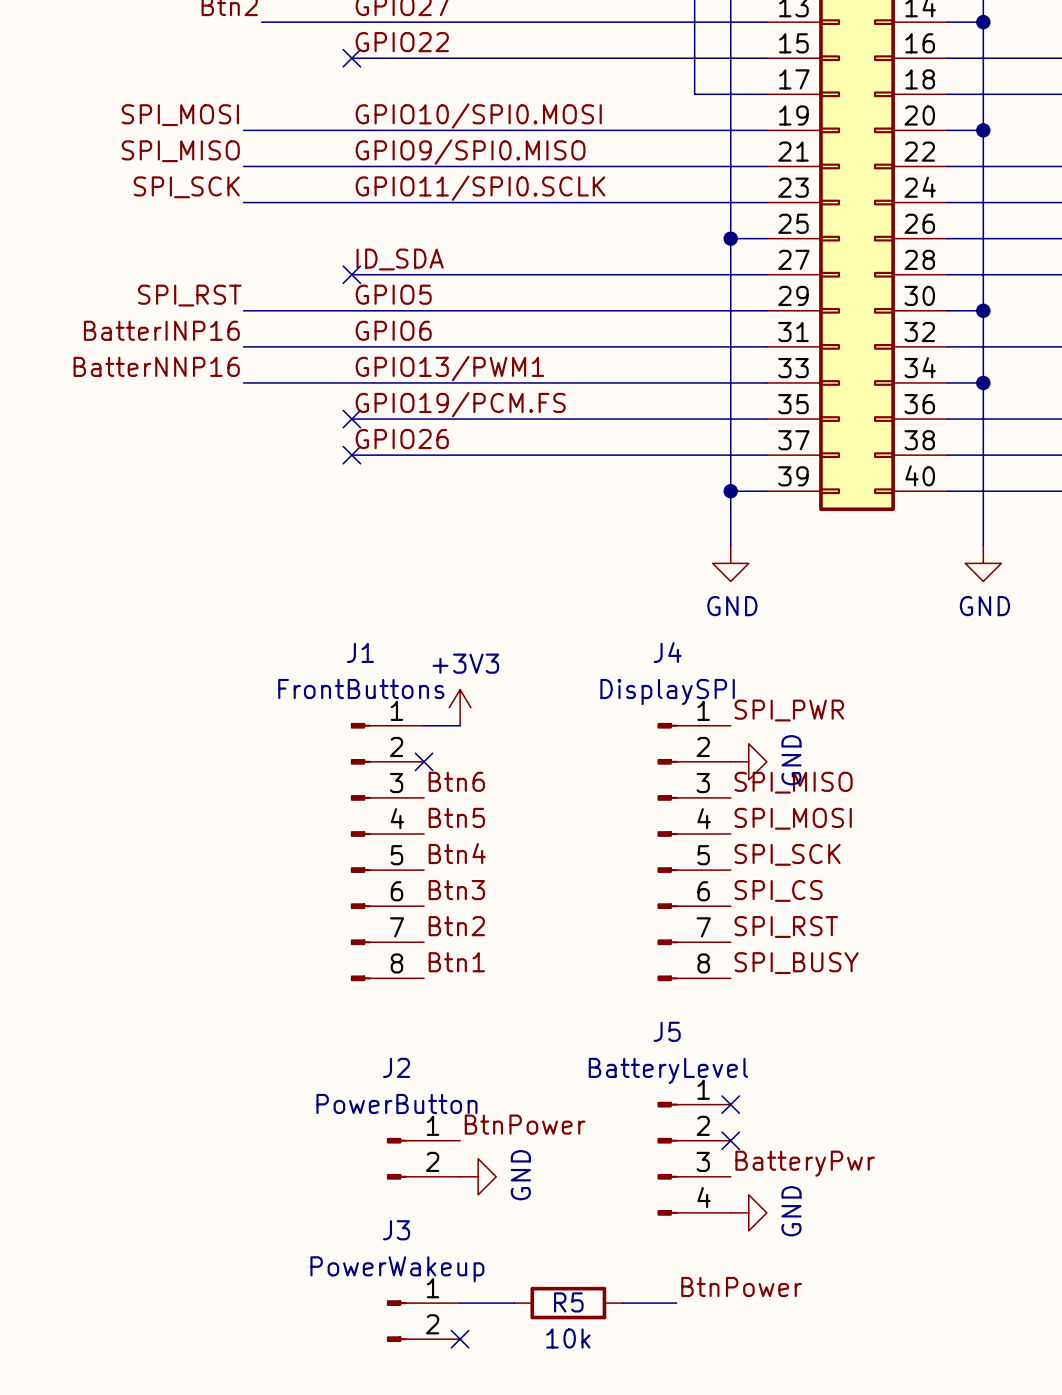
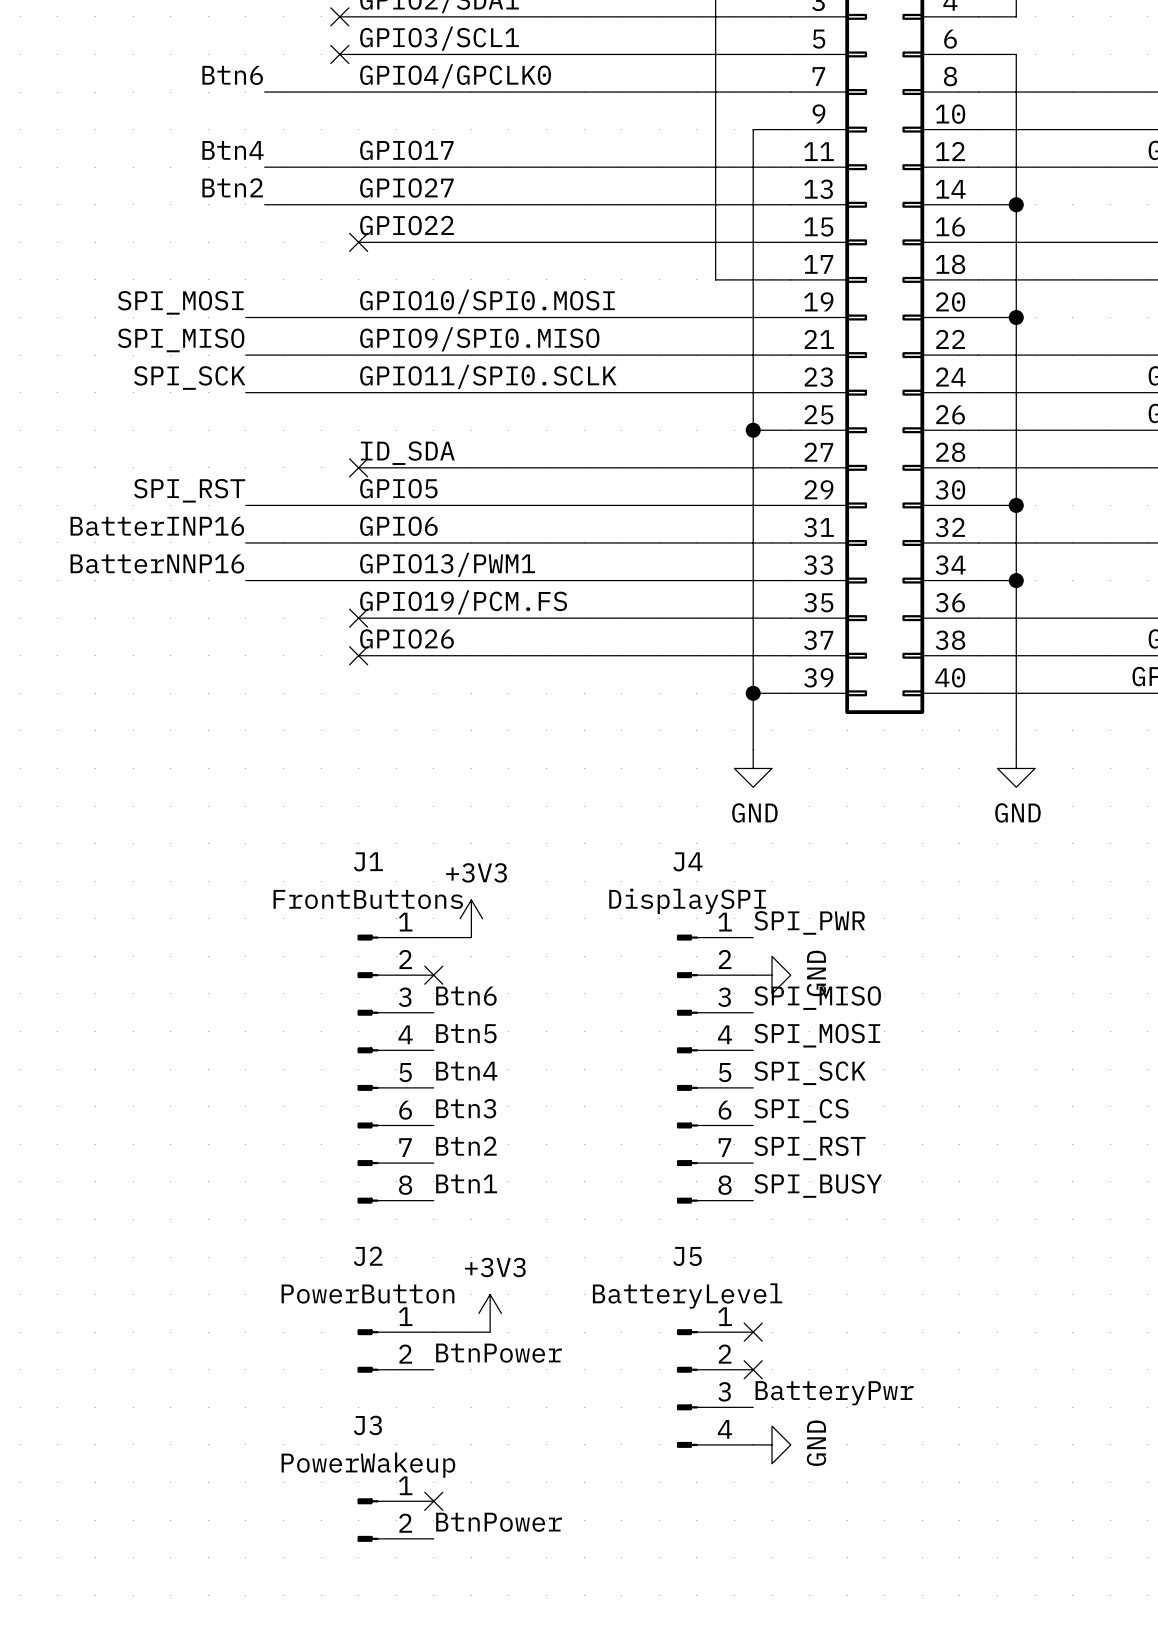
power symbol: none -> +3V3 (490, 1313)
label position: BtnPower (525, 1124) -> BtnPower (499, 1353)
J2 position: (423, 1158) -> (395, 1350)
power symbol: GND (478, 1176) -> none
label: none -> BtnPower (499, 1522)
label: BtnPower (741, 1286) -> none
wire: (460, 1303) (514, 1303) -> (433, 1332) (490, 1332)
R5: 10k (568, 1303) -> none
wire: (622, 1303) (676, 1303) -> none
J3 position: (423, 1321) -> (395, 1520)
no-connect mark position: (460, 1339) -> (433, 1501)

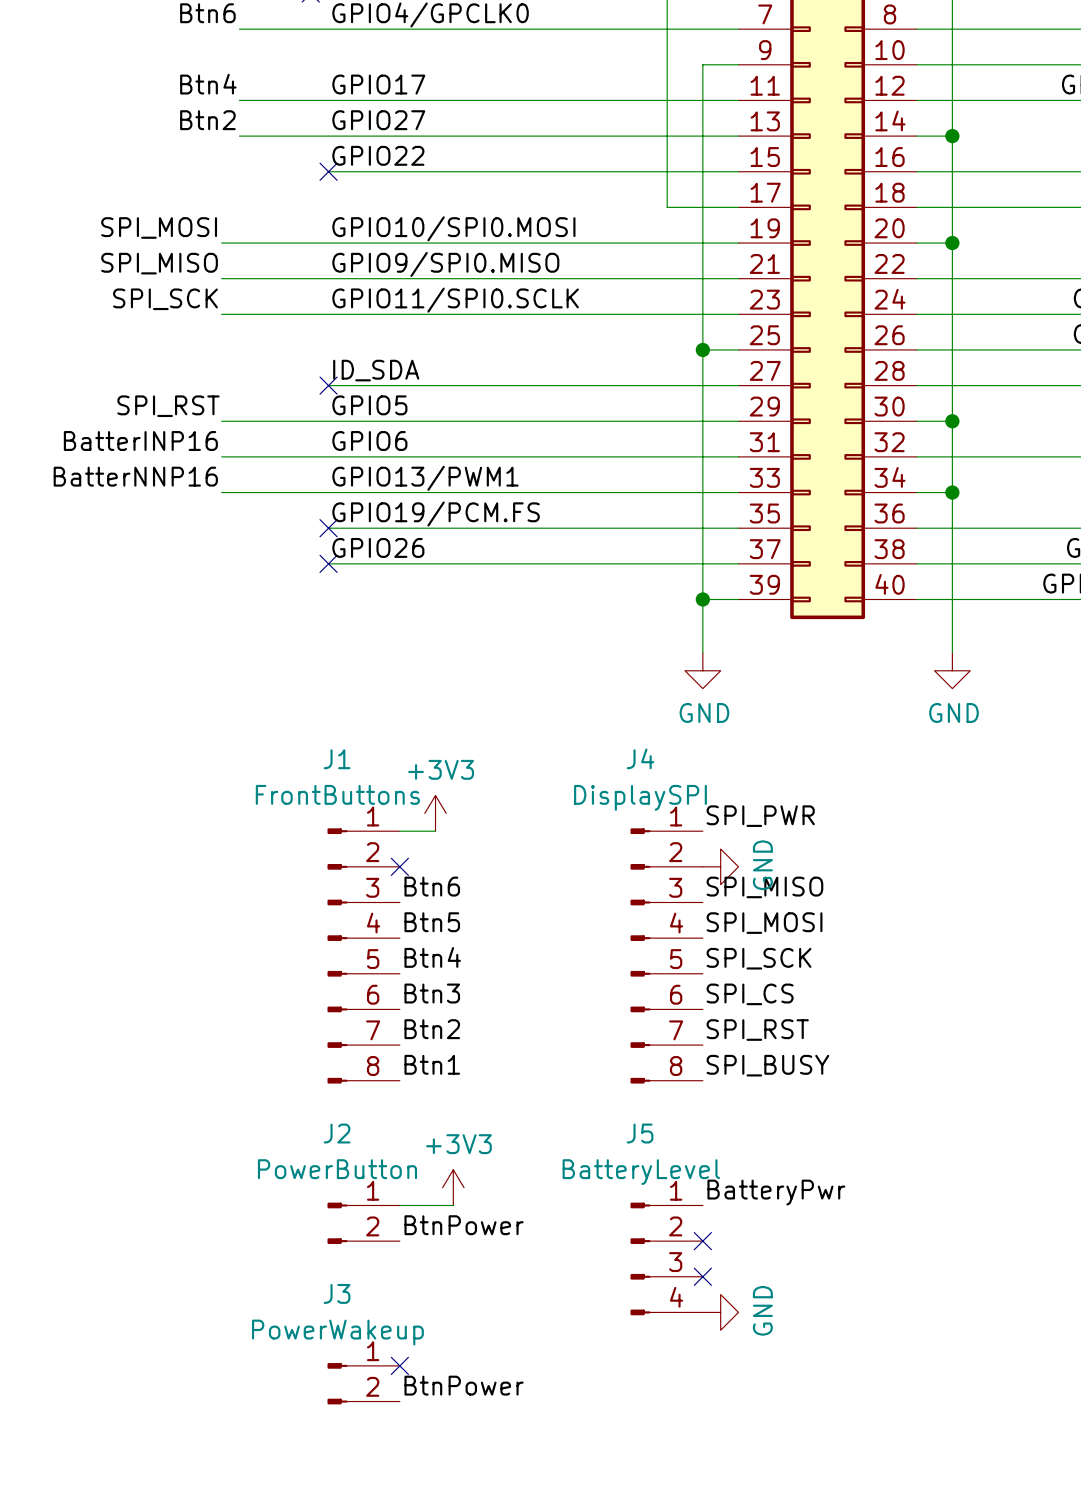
no-connect mark position: (753, 1332) -> (702, 1276)
label position: BatteryPwr (834, 1393) -> BatteryPwr (776, 1192)

